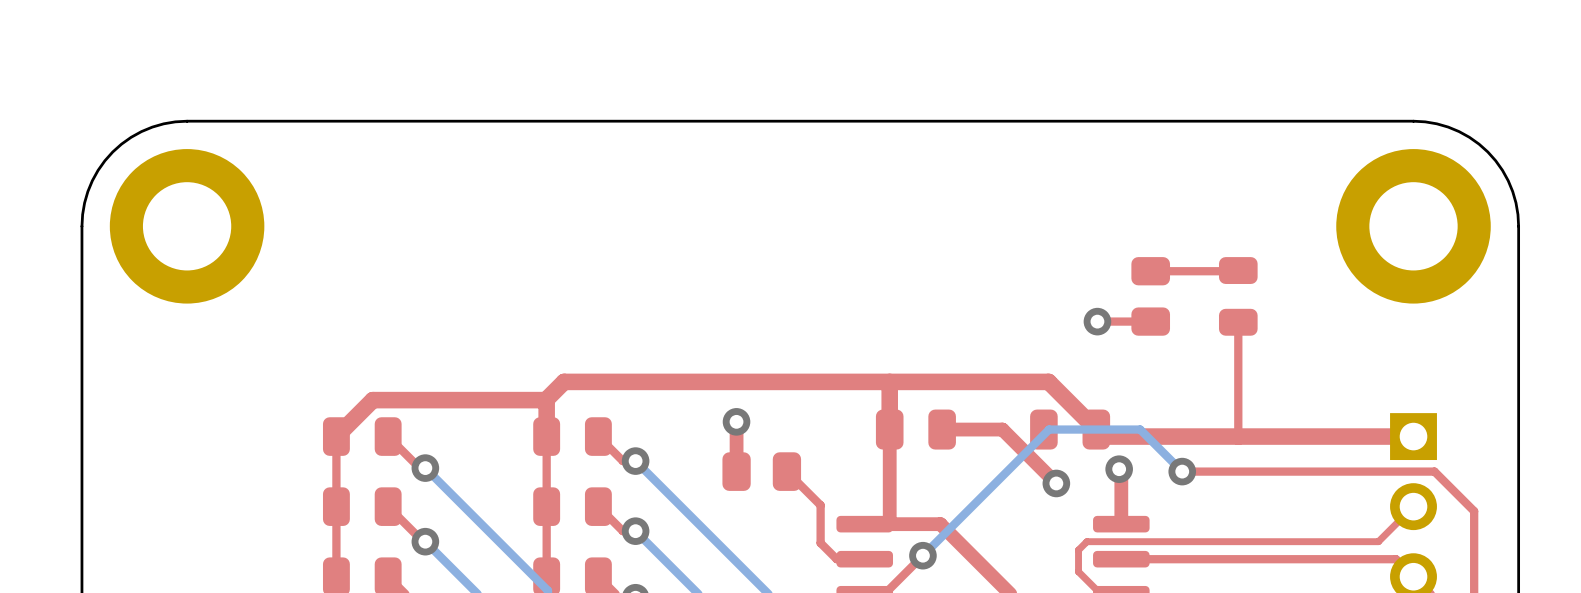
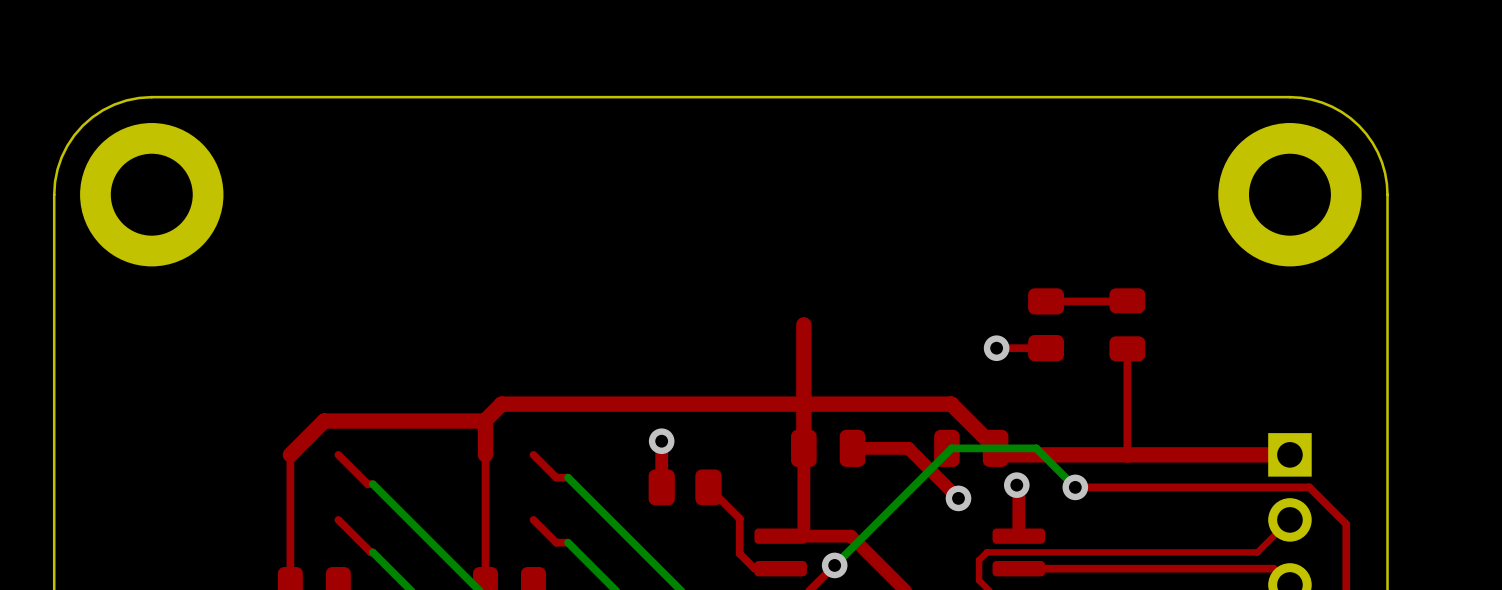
part position: (187, 226) -> (151, 194)
part position: (1413, 226) -> (1289, 194)
board edge: (1518, 226) (1512, 191) (1502, 170) (1487, 151) (1469, 137) (1448, 127) (1413, 121) (175, 121) (141, 131) (112, 151) (92, 180) (84, 202) (81, 226) -> (1387, 259) (1386, 183) (1377, 152) (1366, 133) (1341, 112) (1322, 102) (1300, 97) (151, 97) (126, 100) (102, 110) (82, 125) (67, 145) (57, 169) (55, 181) (54, 259)
top track: none -> (803, 324) (803, 404)
part: (362, 436) -> none
part: (572, 436) -> none
via: (635, 461) -> none
via: (425, 468) -> none
part: (362, 506) -> none
part: (572, 506) -> none
via: (635, 531) -> none
via: (425, 541) -> none

